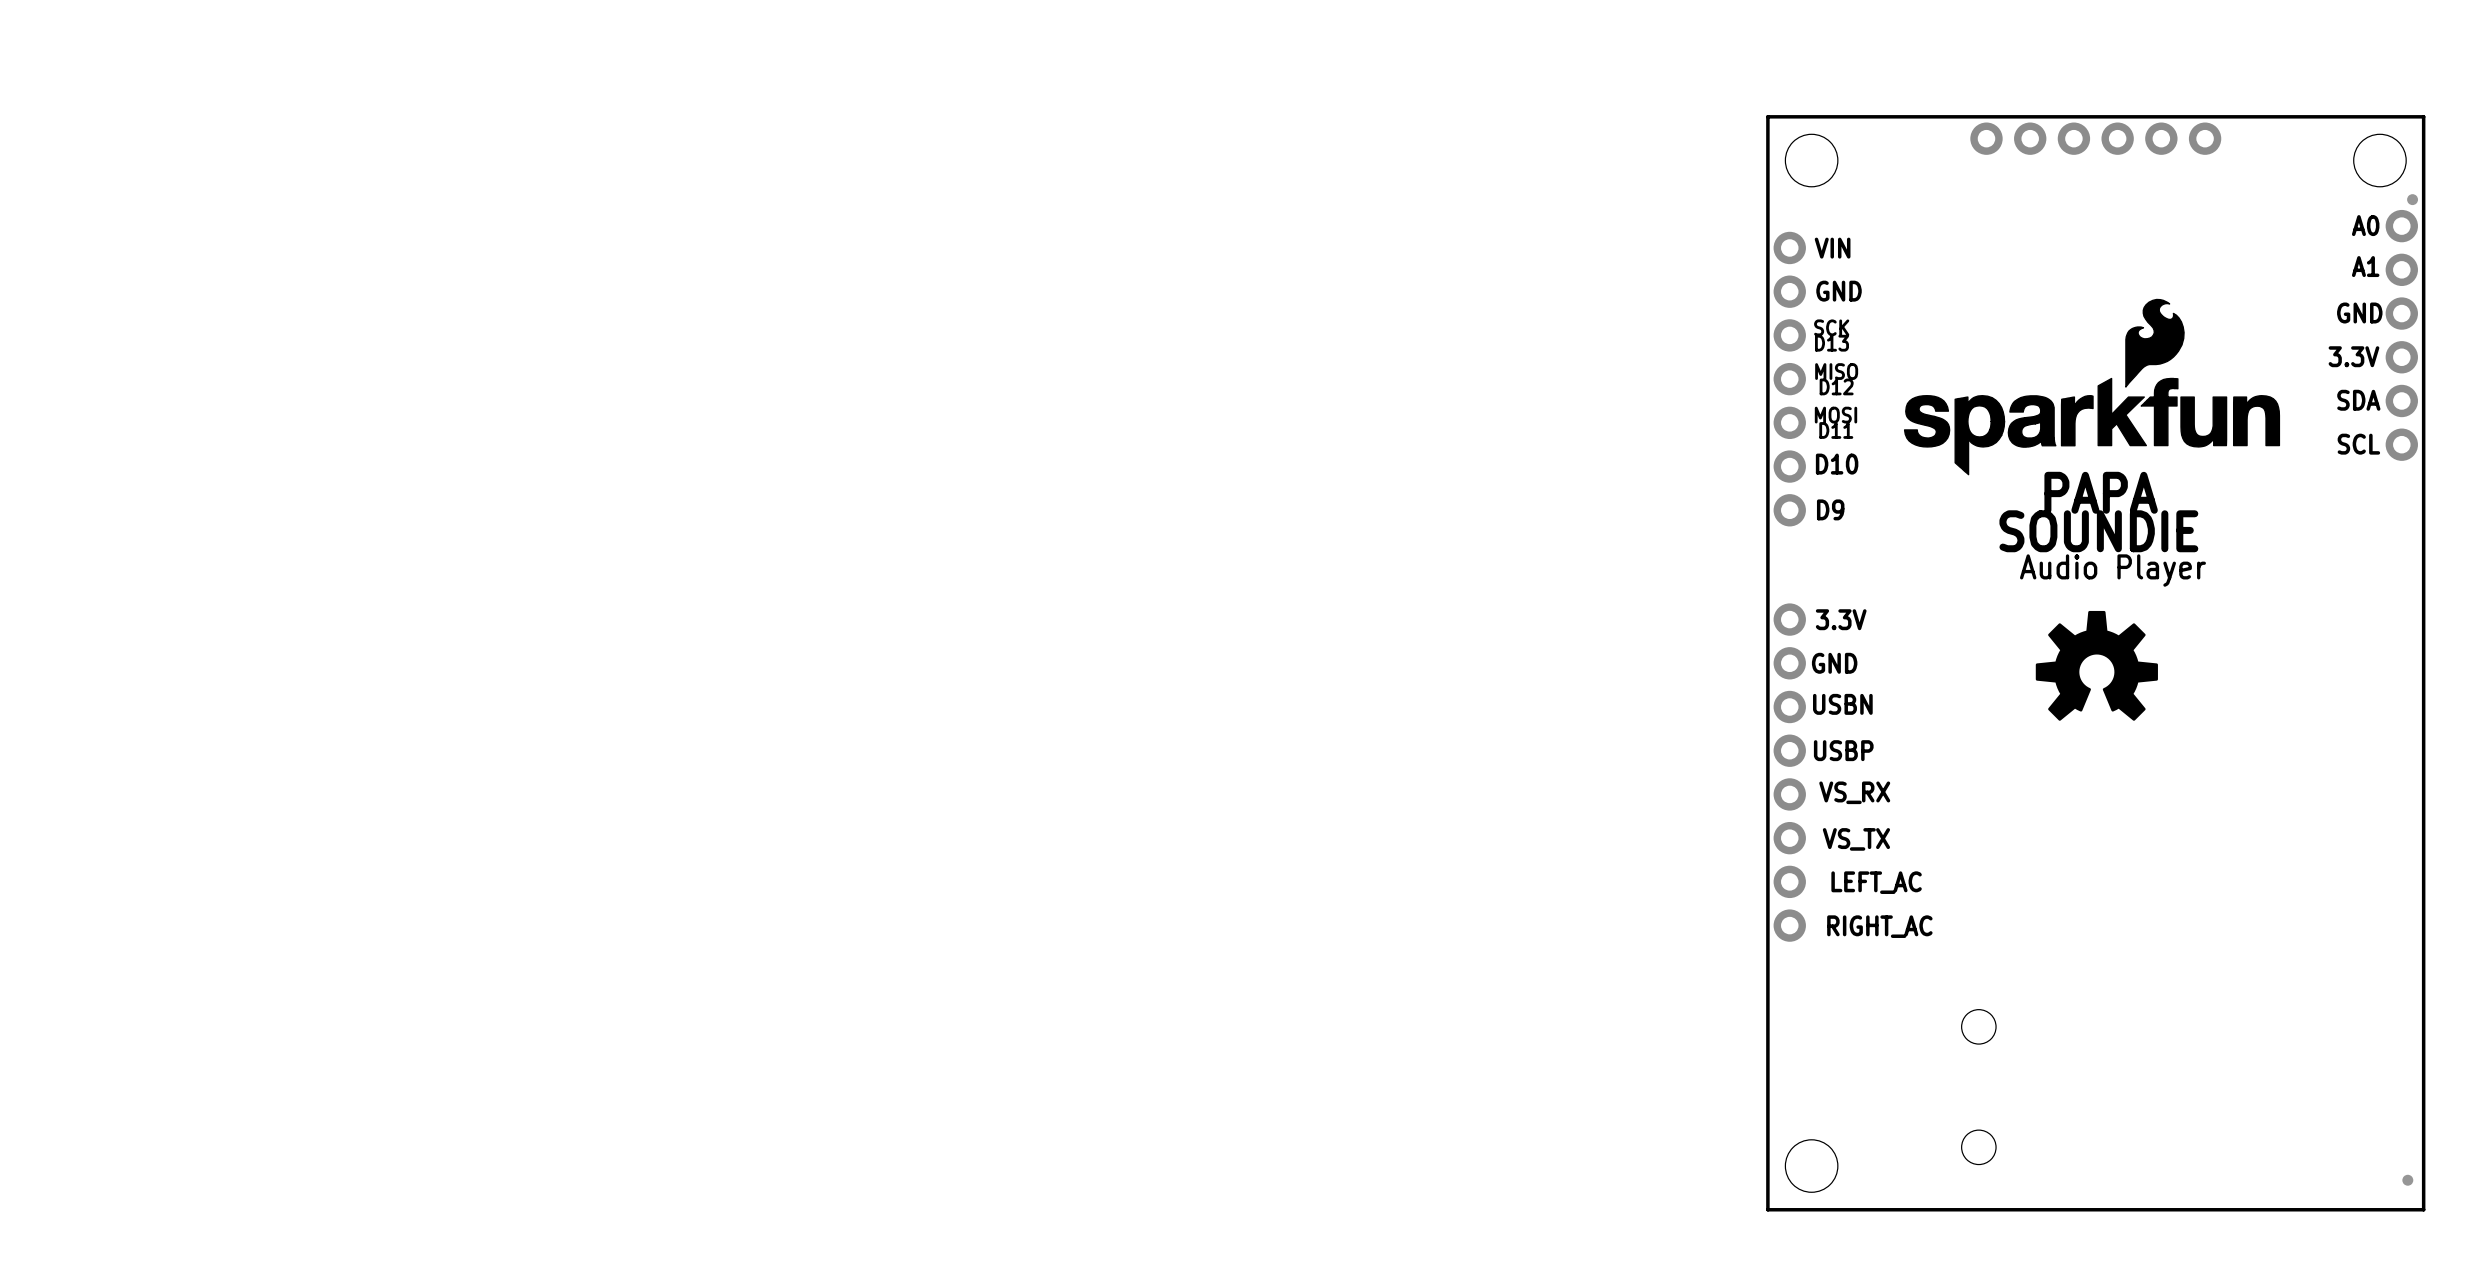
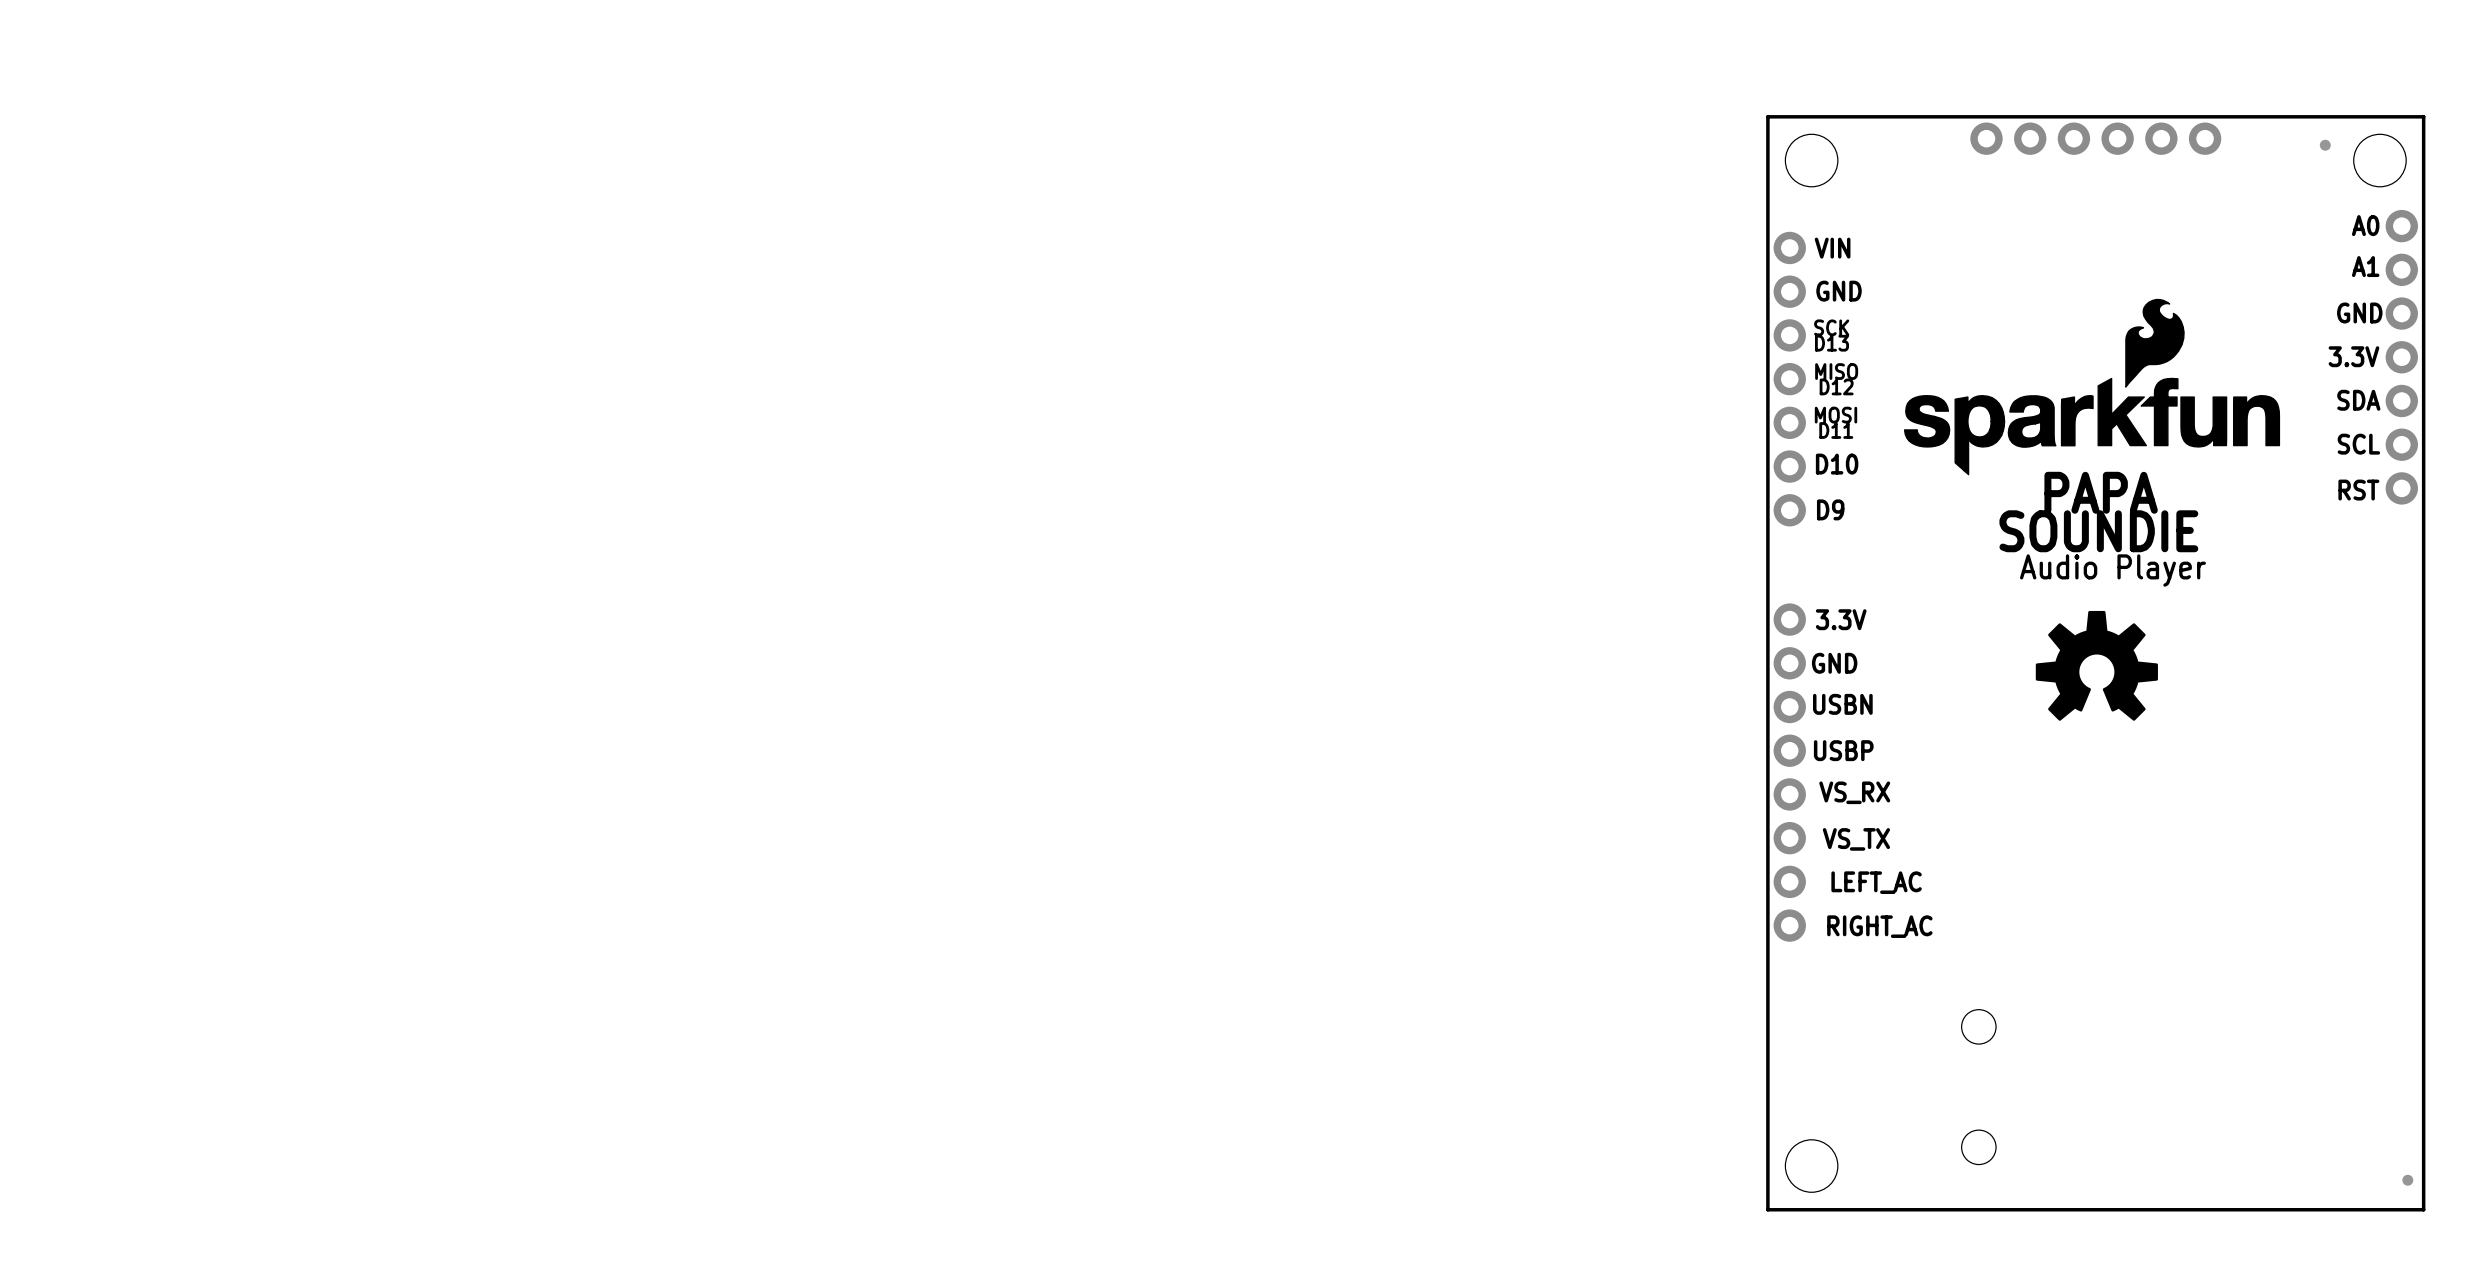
part position: (2412, 199) -> (2325, 145)
part: none -> (2401, 488)
text: none -> RST (2358, 490)

